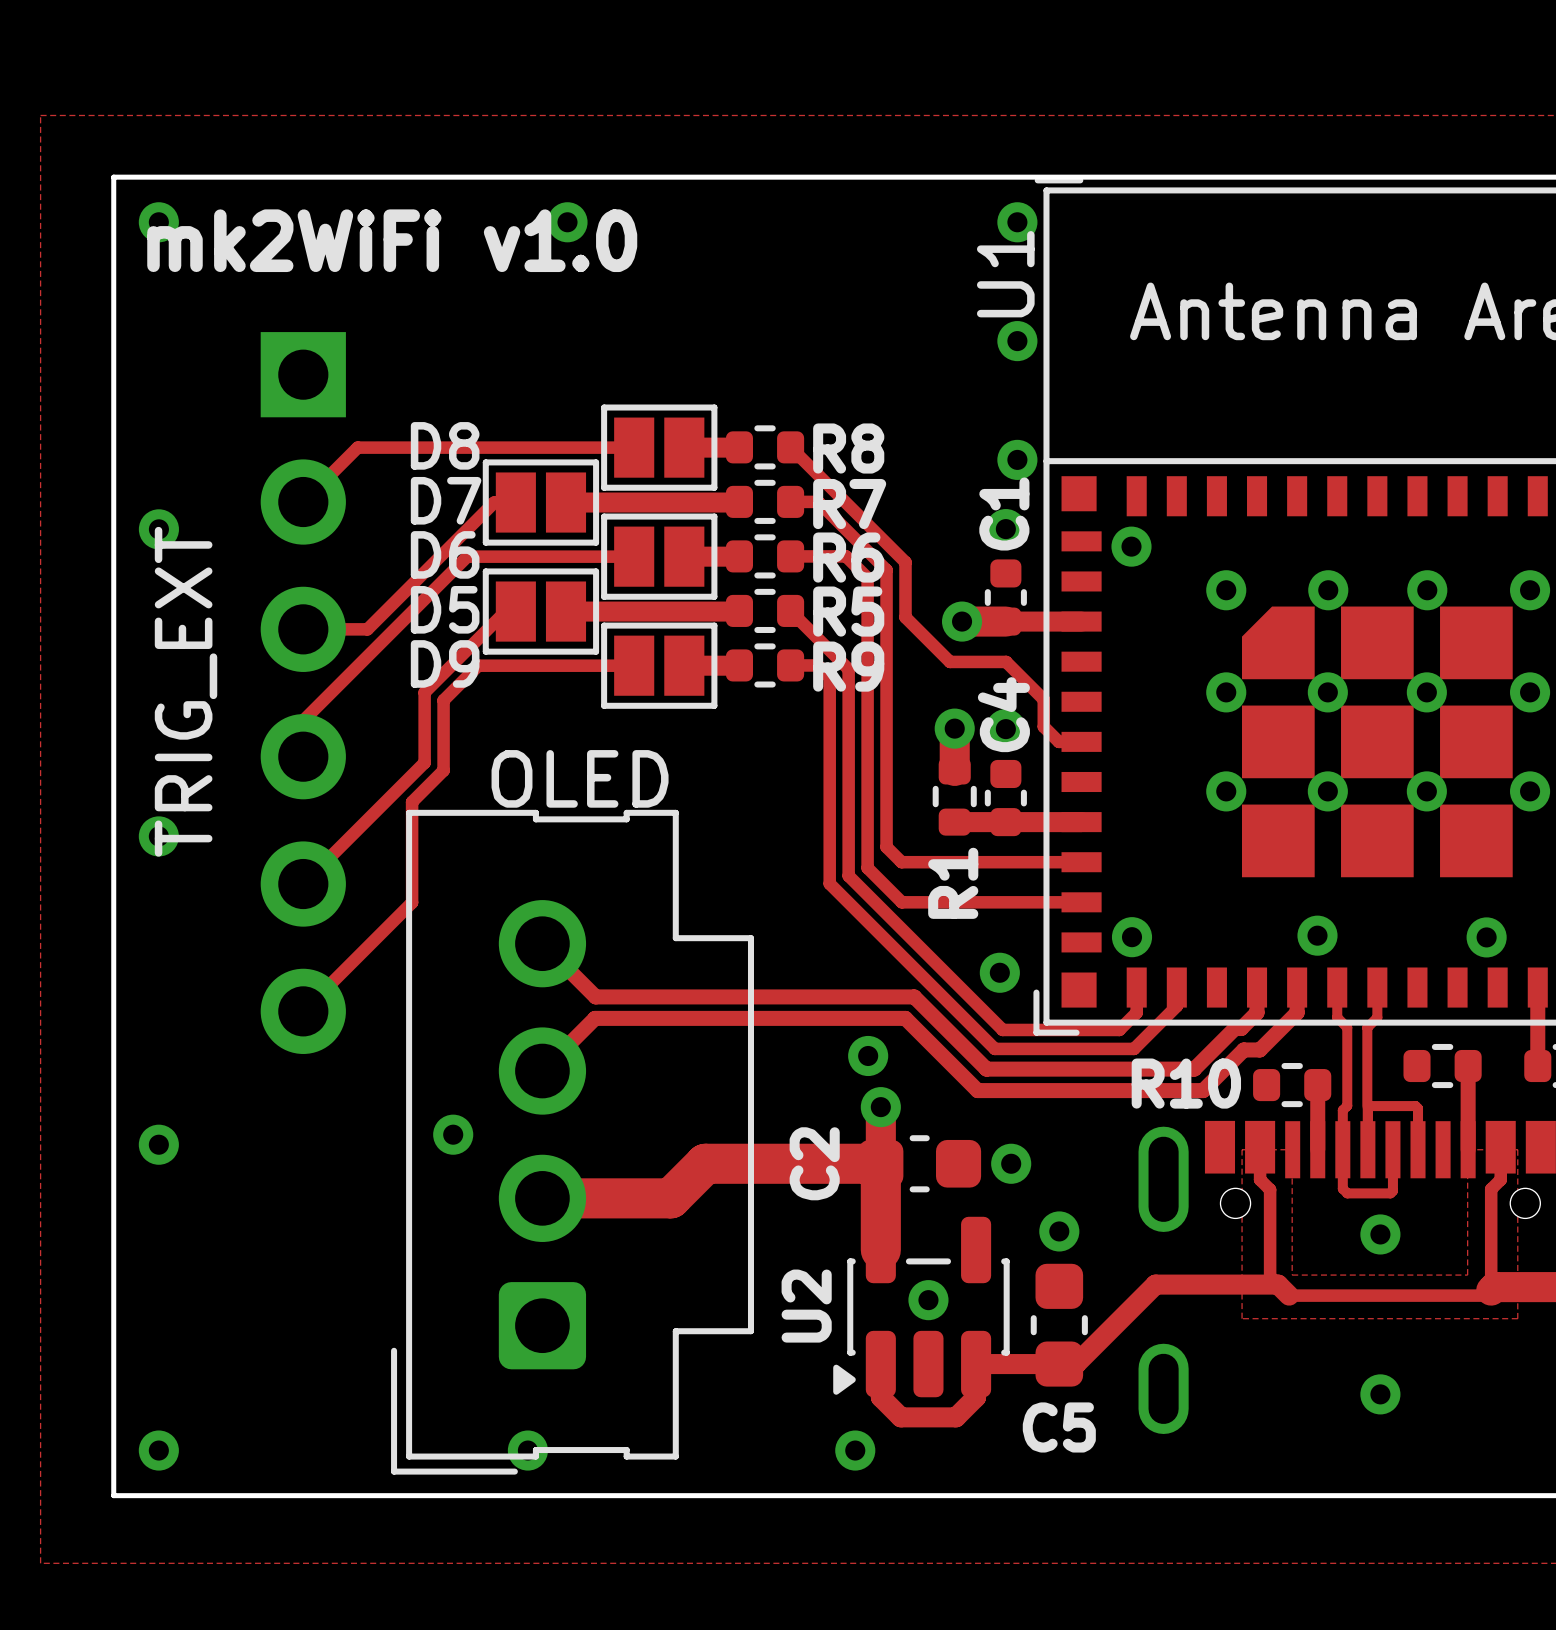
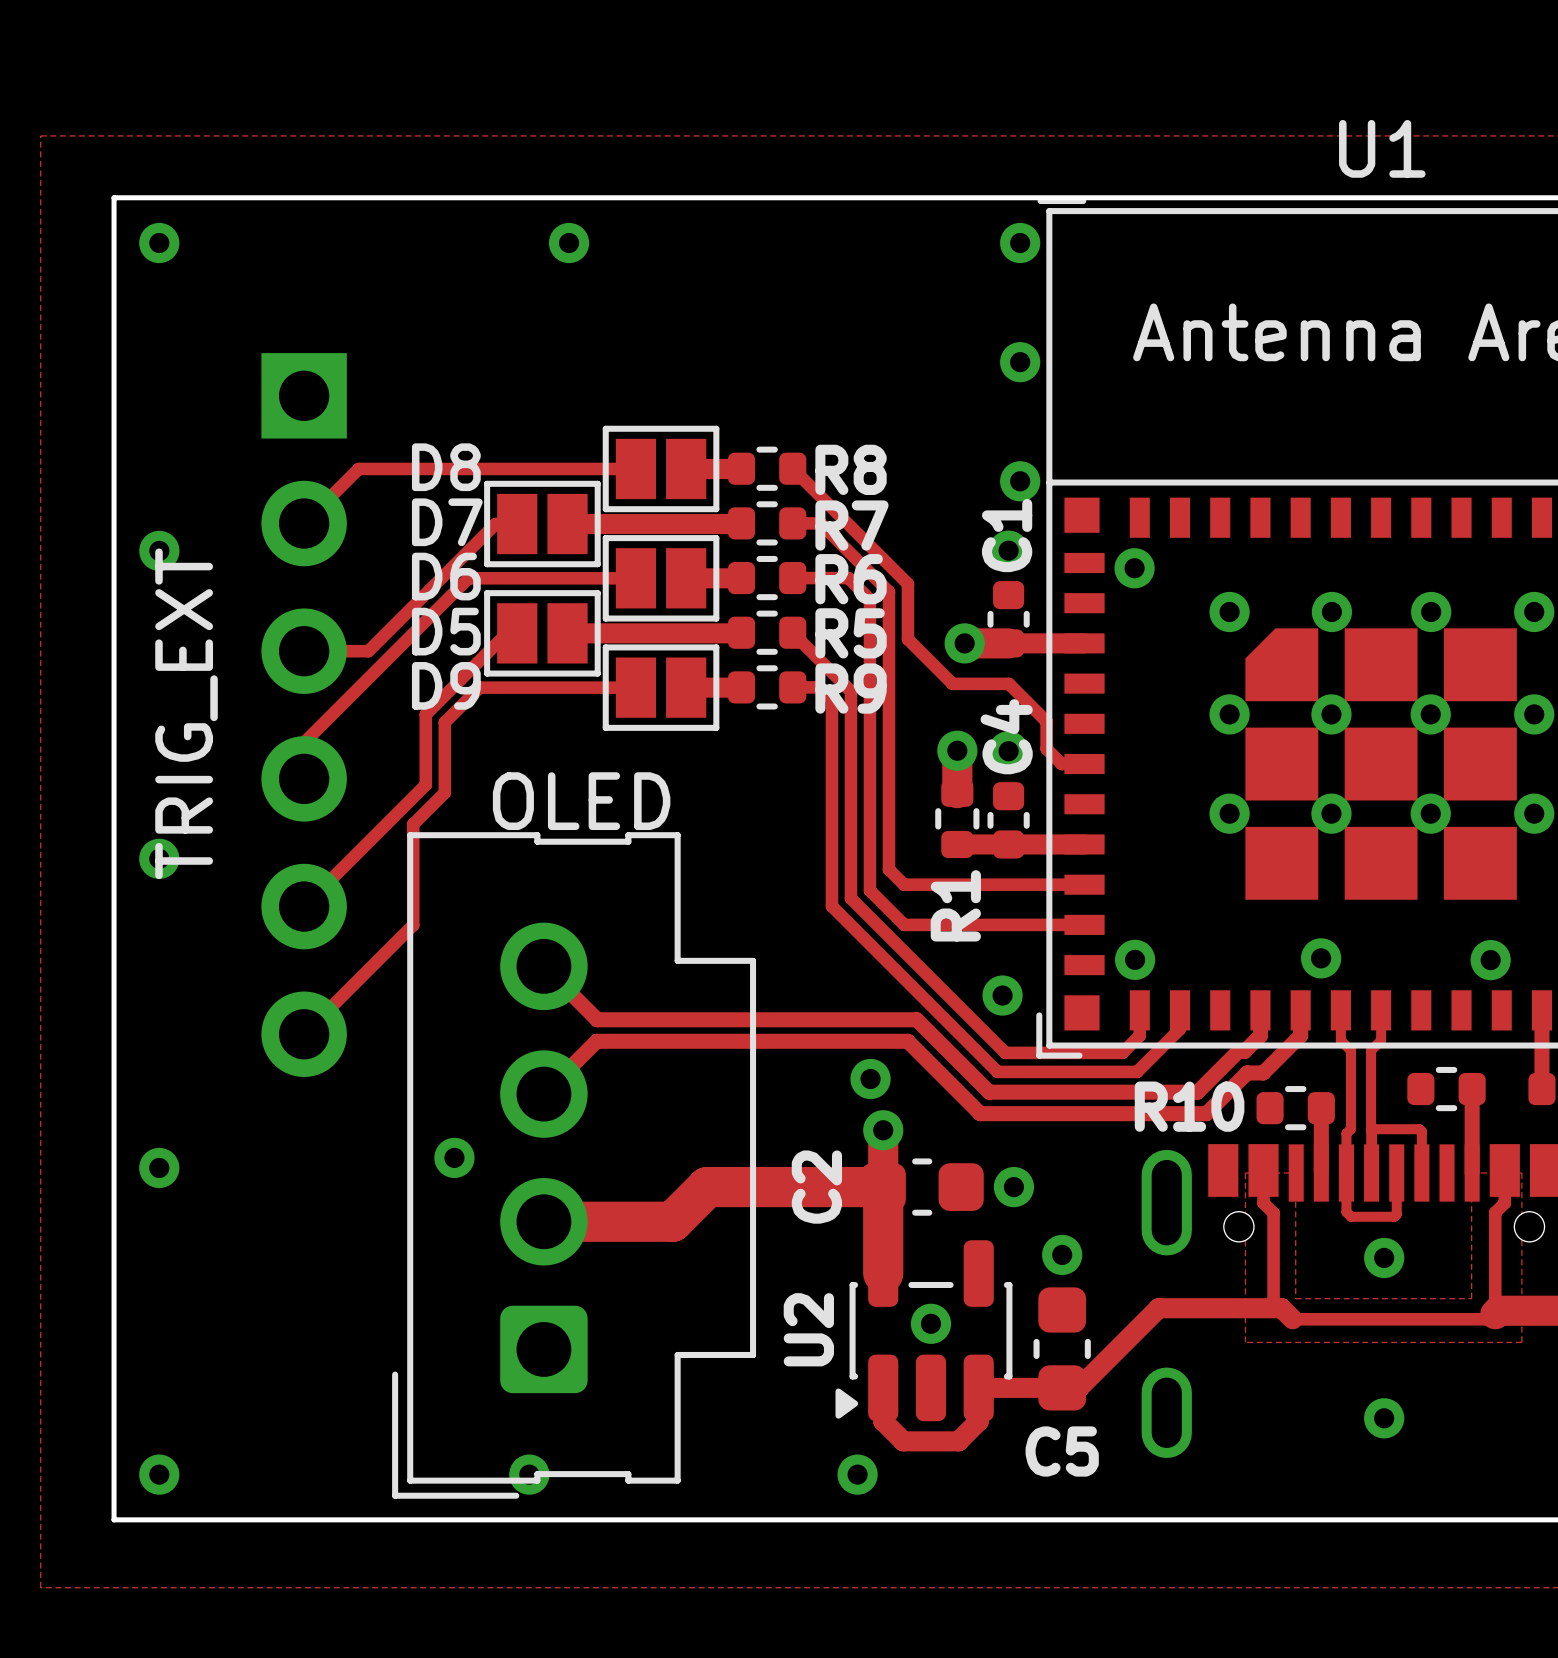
text: mk2WiFi v1.0 (392, 240) -> none
U1 name rotation: 0° (1005, 274) -> 90° clockwise (1382, 148)
U1 name position: U1 (1005, 274) -> U1 (1382, 148)

